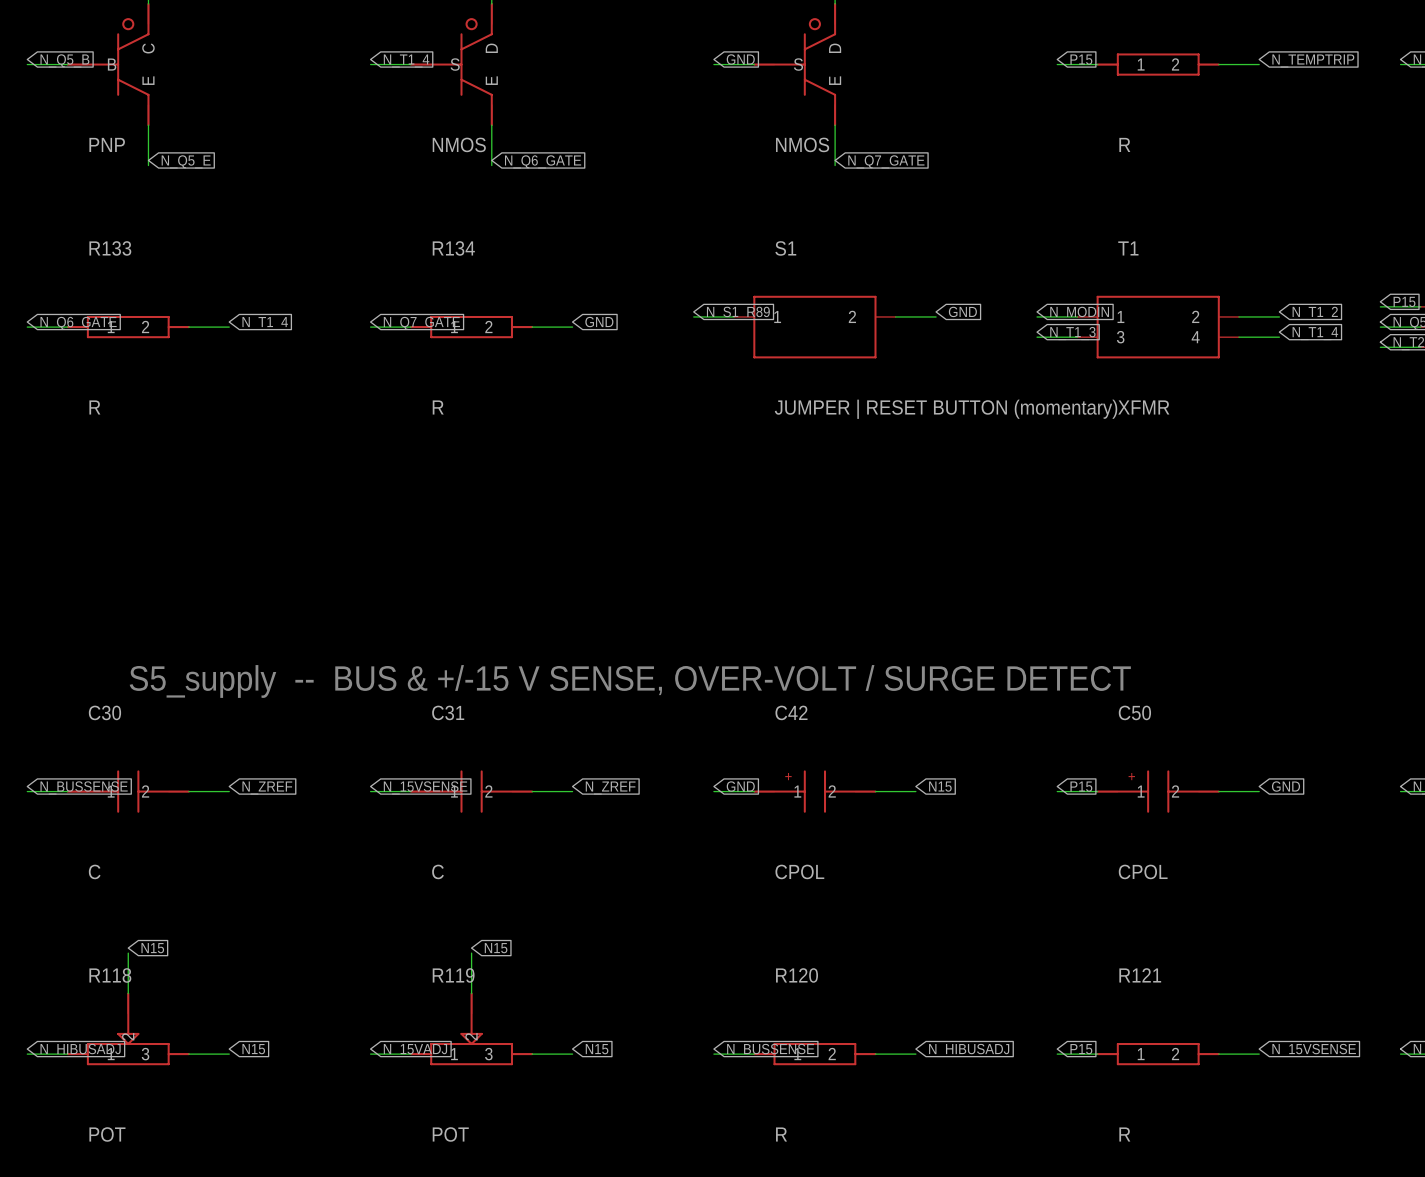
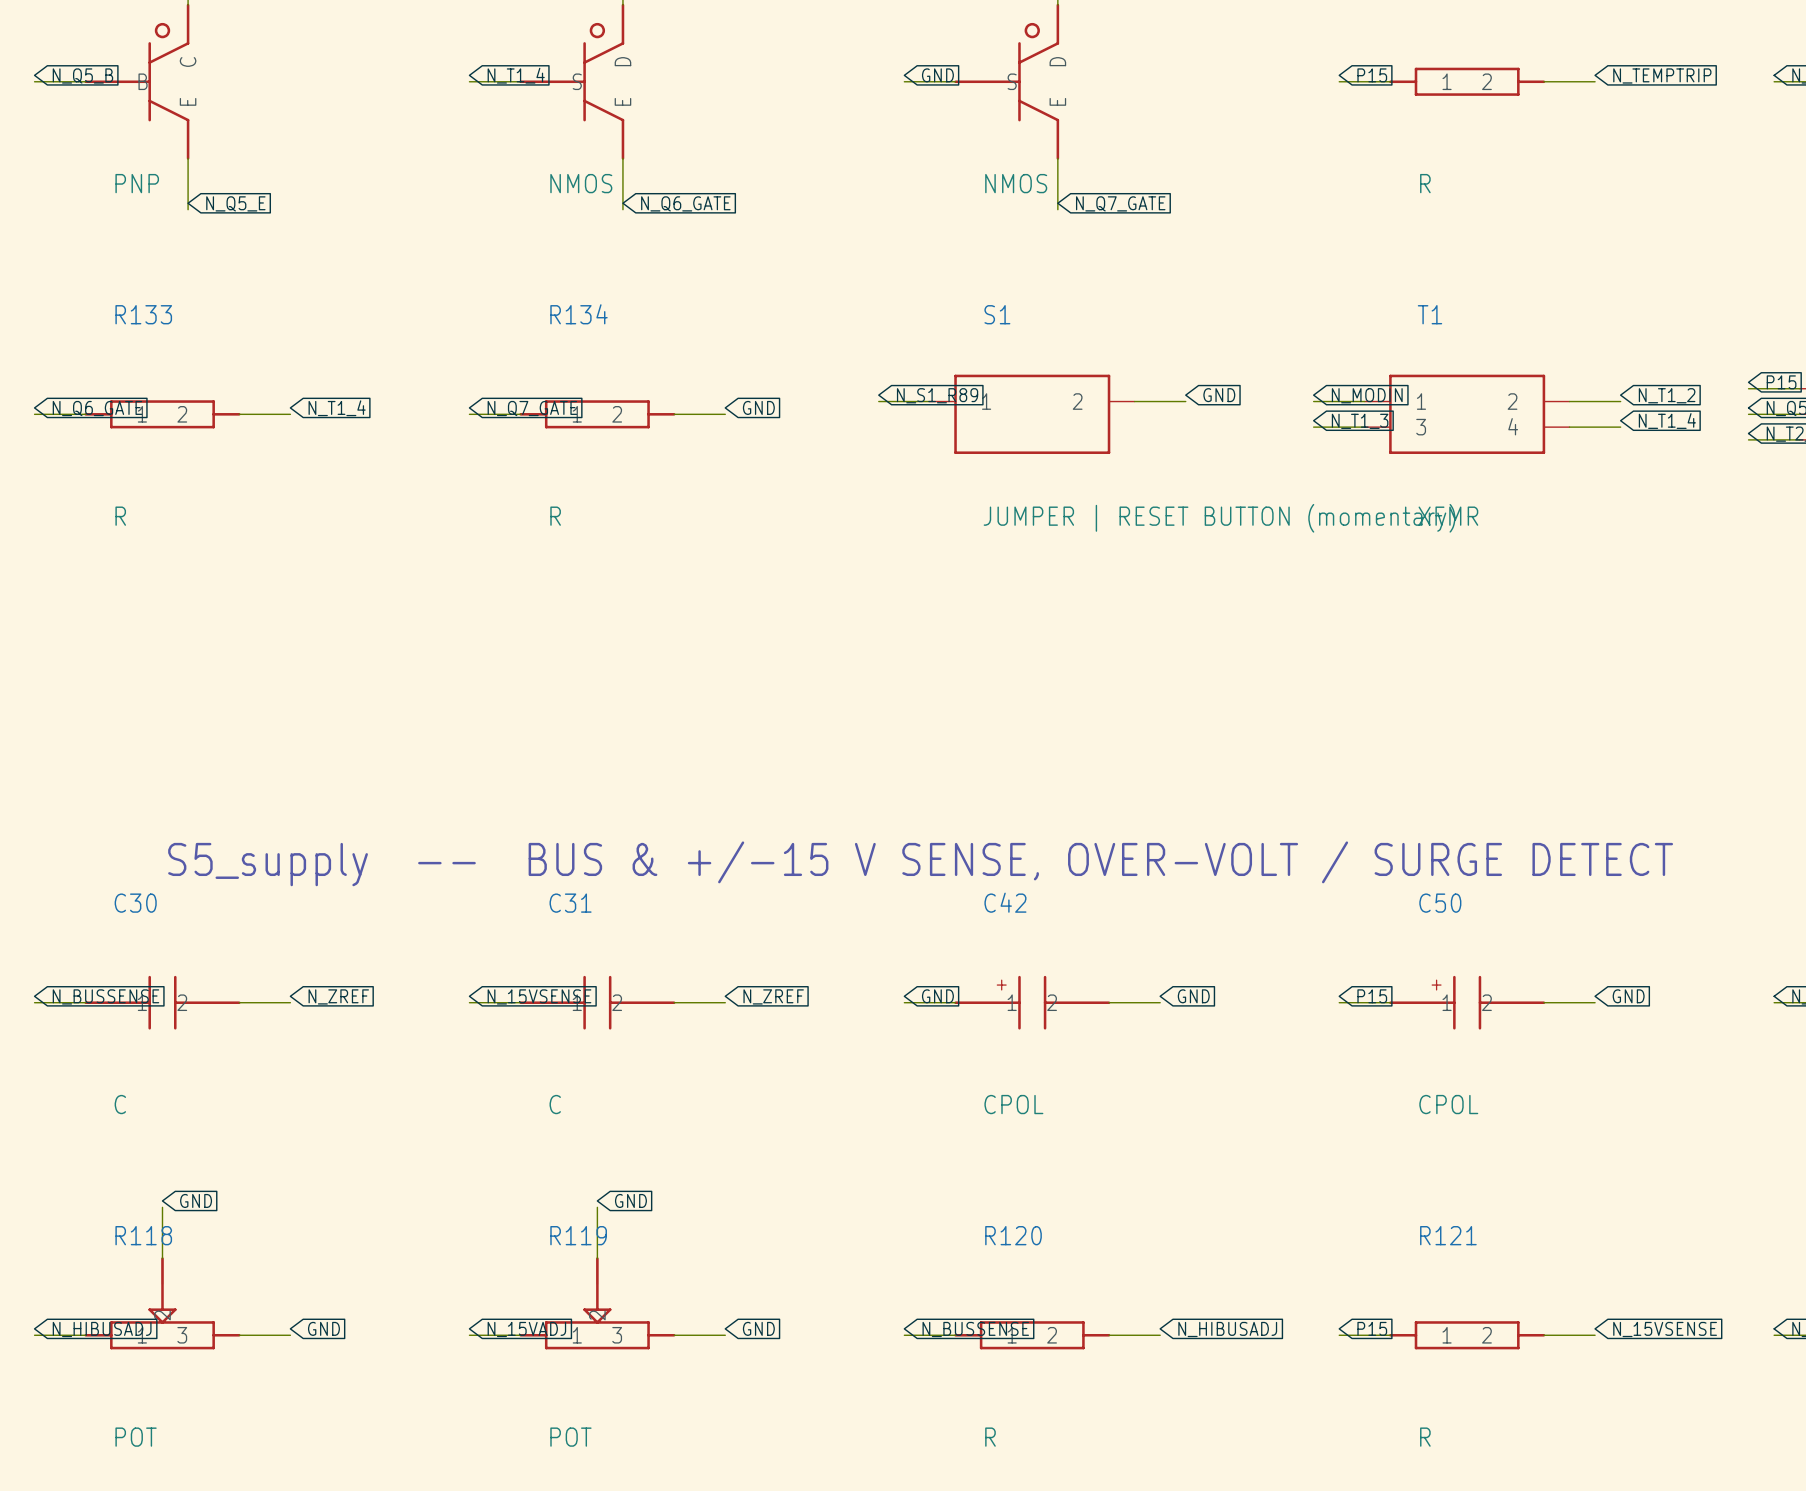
global label: N15 (940, 786) -> GND (1193, 996)
global label: N15 (152, 948) -> GND (196, 1200)
global label: N15 (496, 948) -> GND (630, 1200)
global label: N15 (253, 1049) -> GND (323, 1328)
global label: N15 (597, 1049) -> GND (758, 1328)

